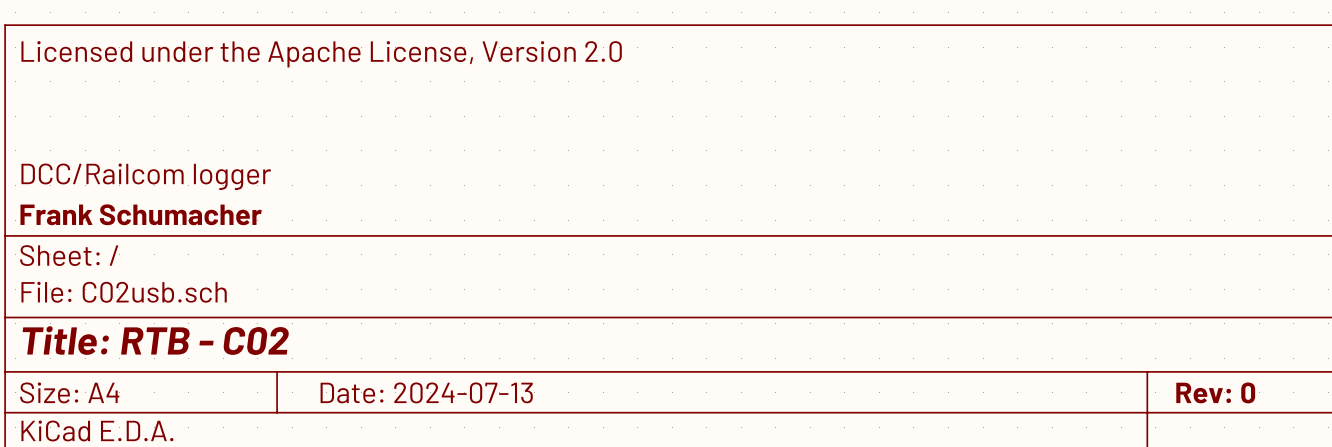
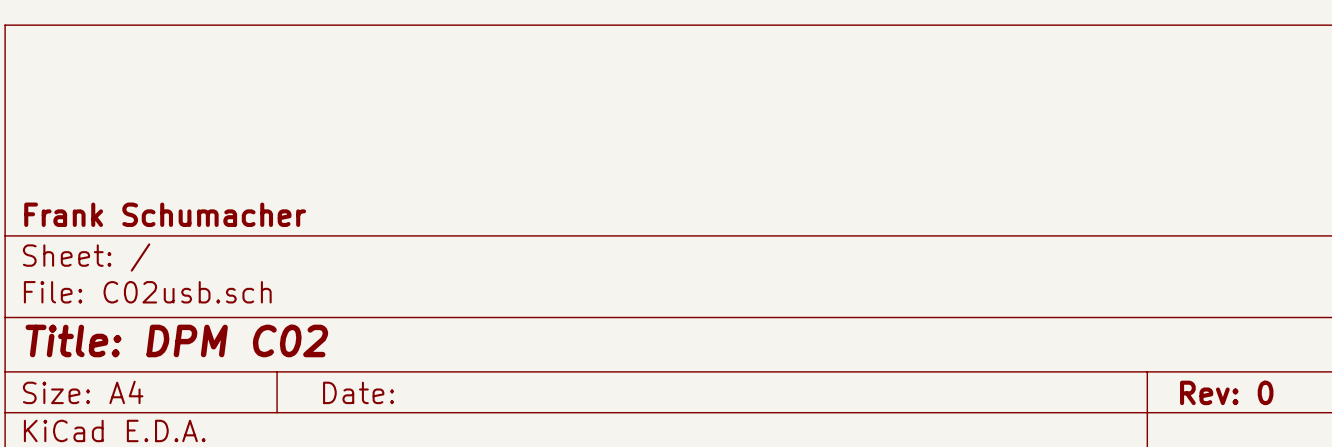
title block: Licensed under the Apache License, Version 2.0 (321, 54) -> none
title block: DCC/Railcom logger (146, 176) -> none
title block: Title: RTB - C02 (155, 340) -> Title: DPM C02 (176, 340)
title block: Date: 2024-07-13 (426, 392) -> Date: (358, 392)

